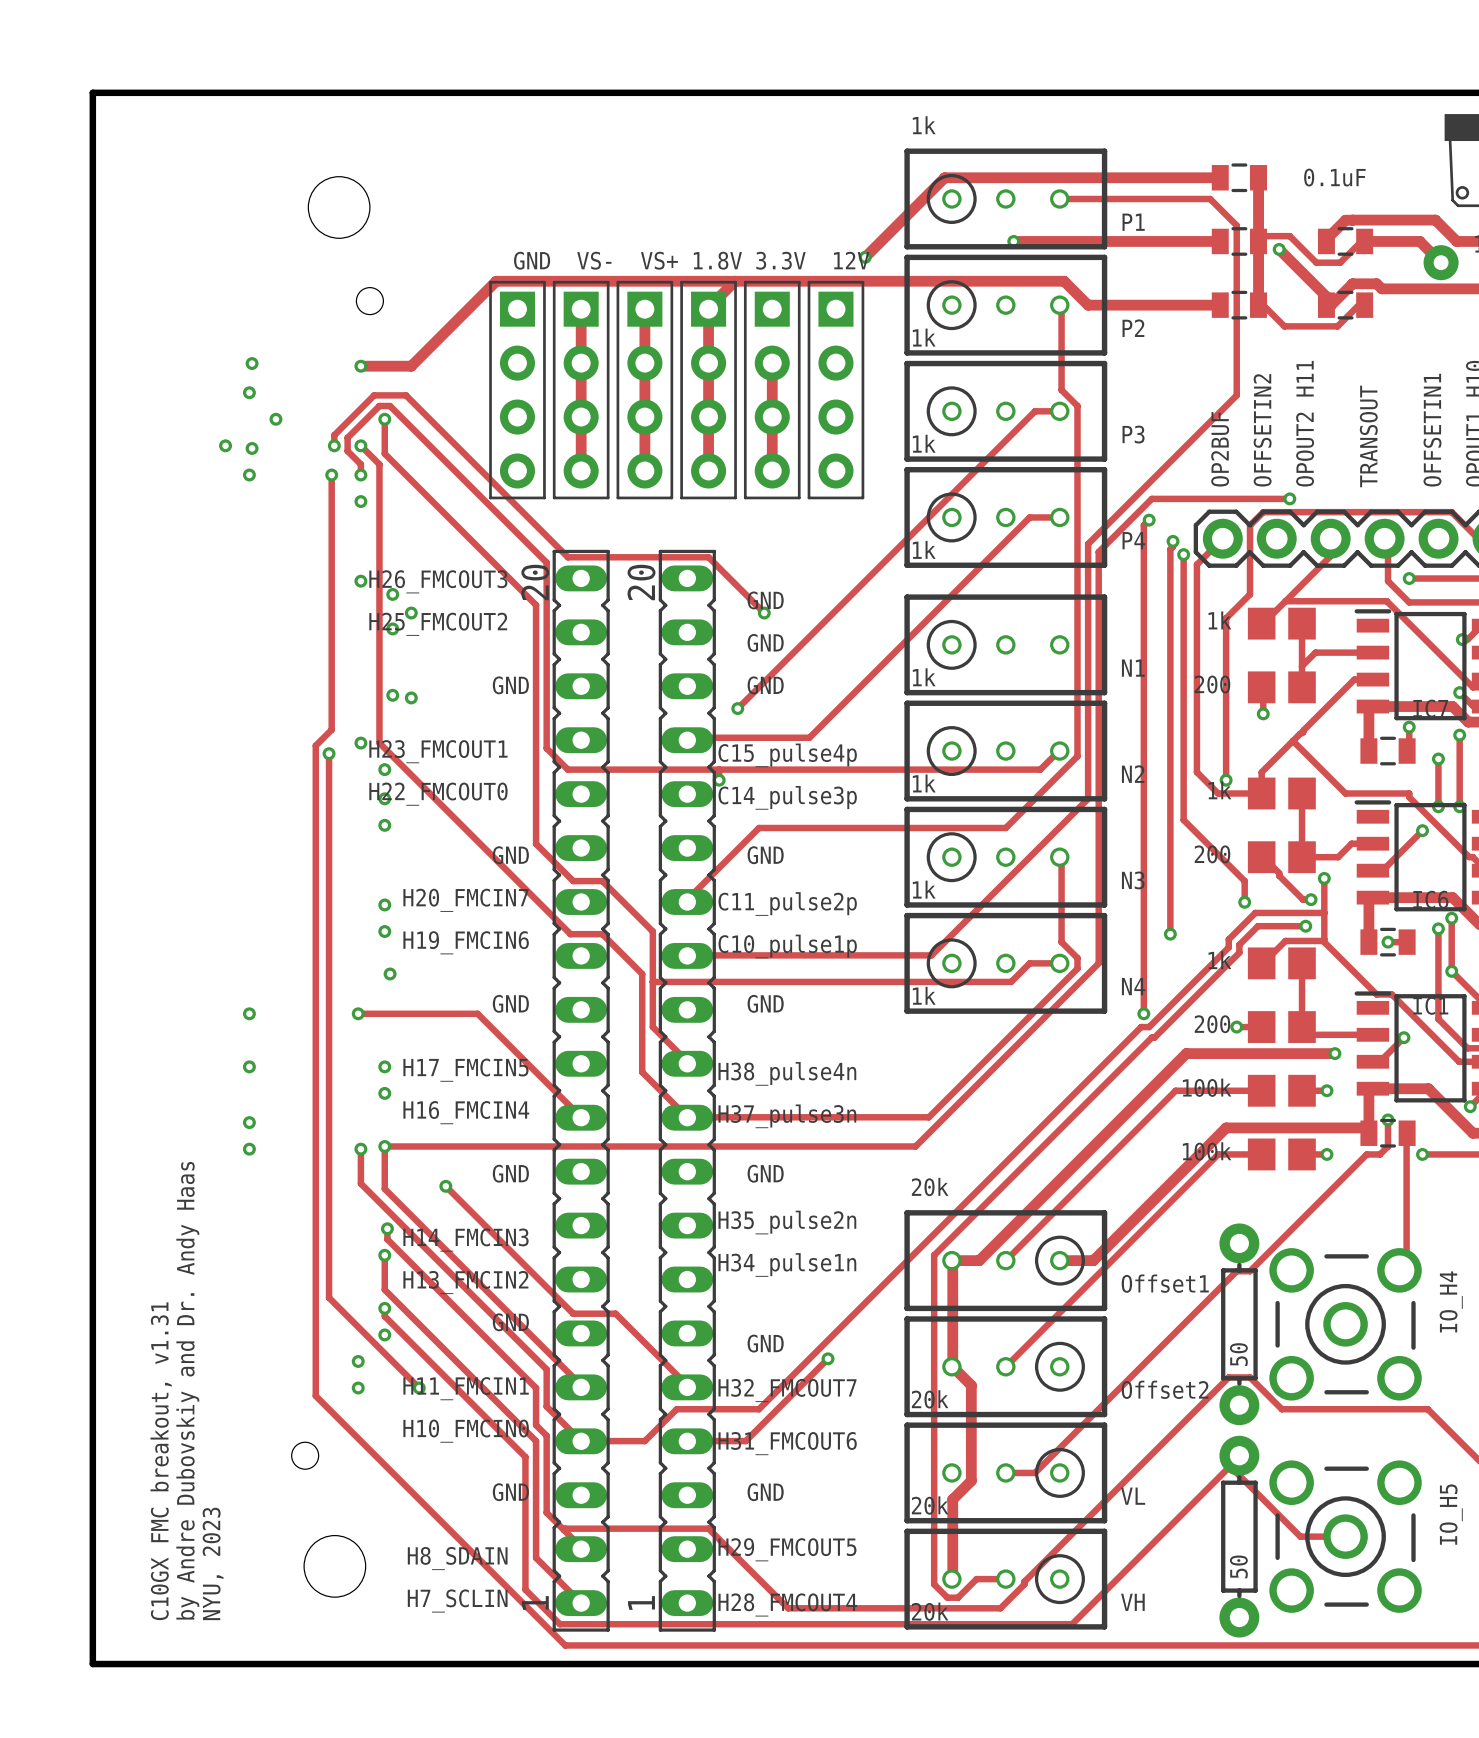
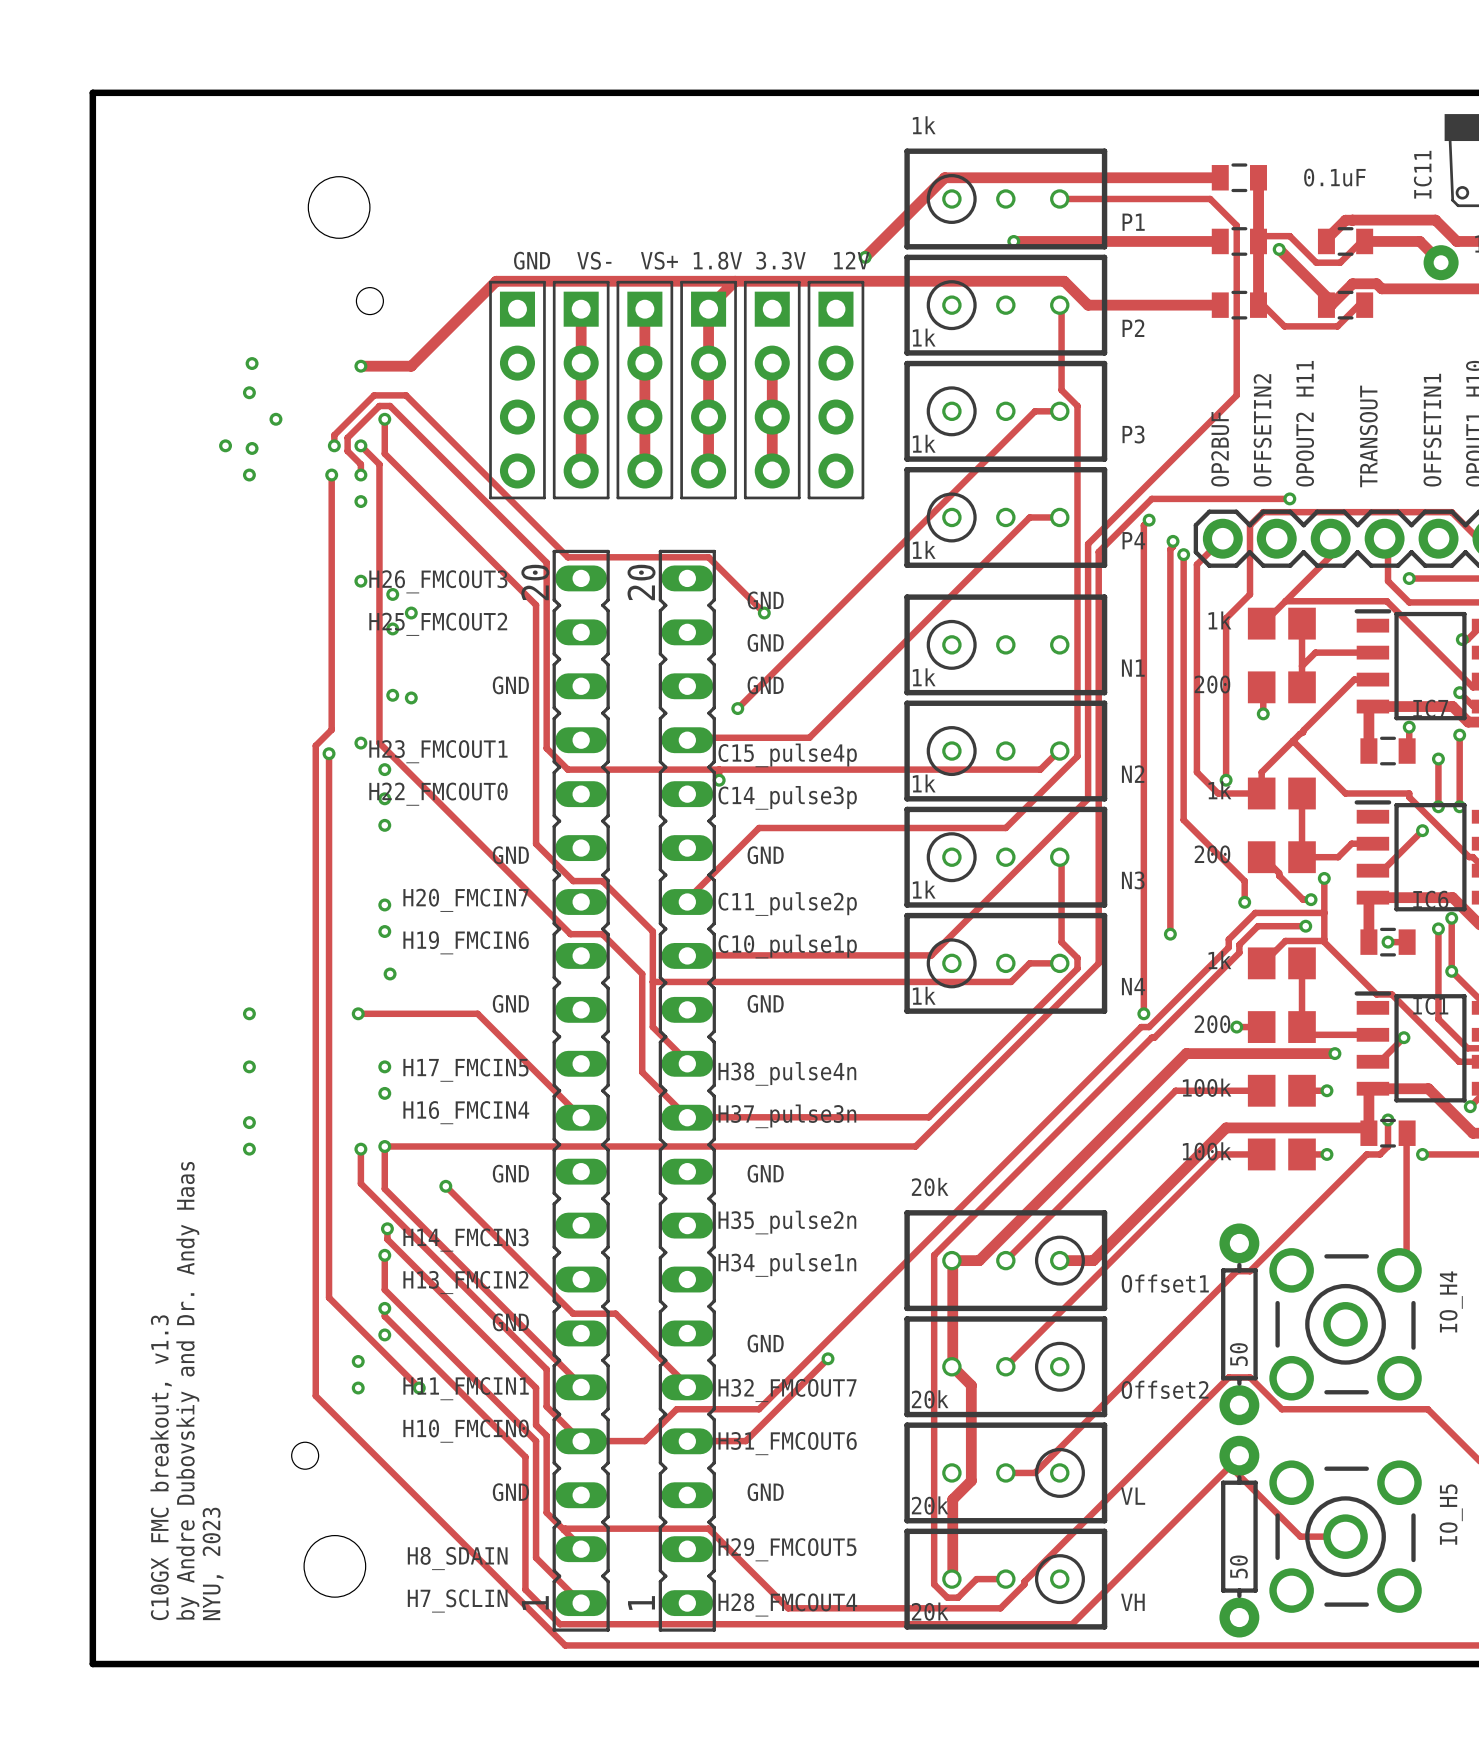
IC11 name: none -> IC11 (1422, 174)
text: C10GX FMC breakout, v1.31 (161, 1461) -> C10GX FMC breakout, v1.3 (161, 1467)

